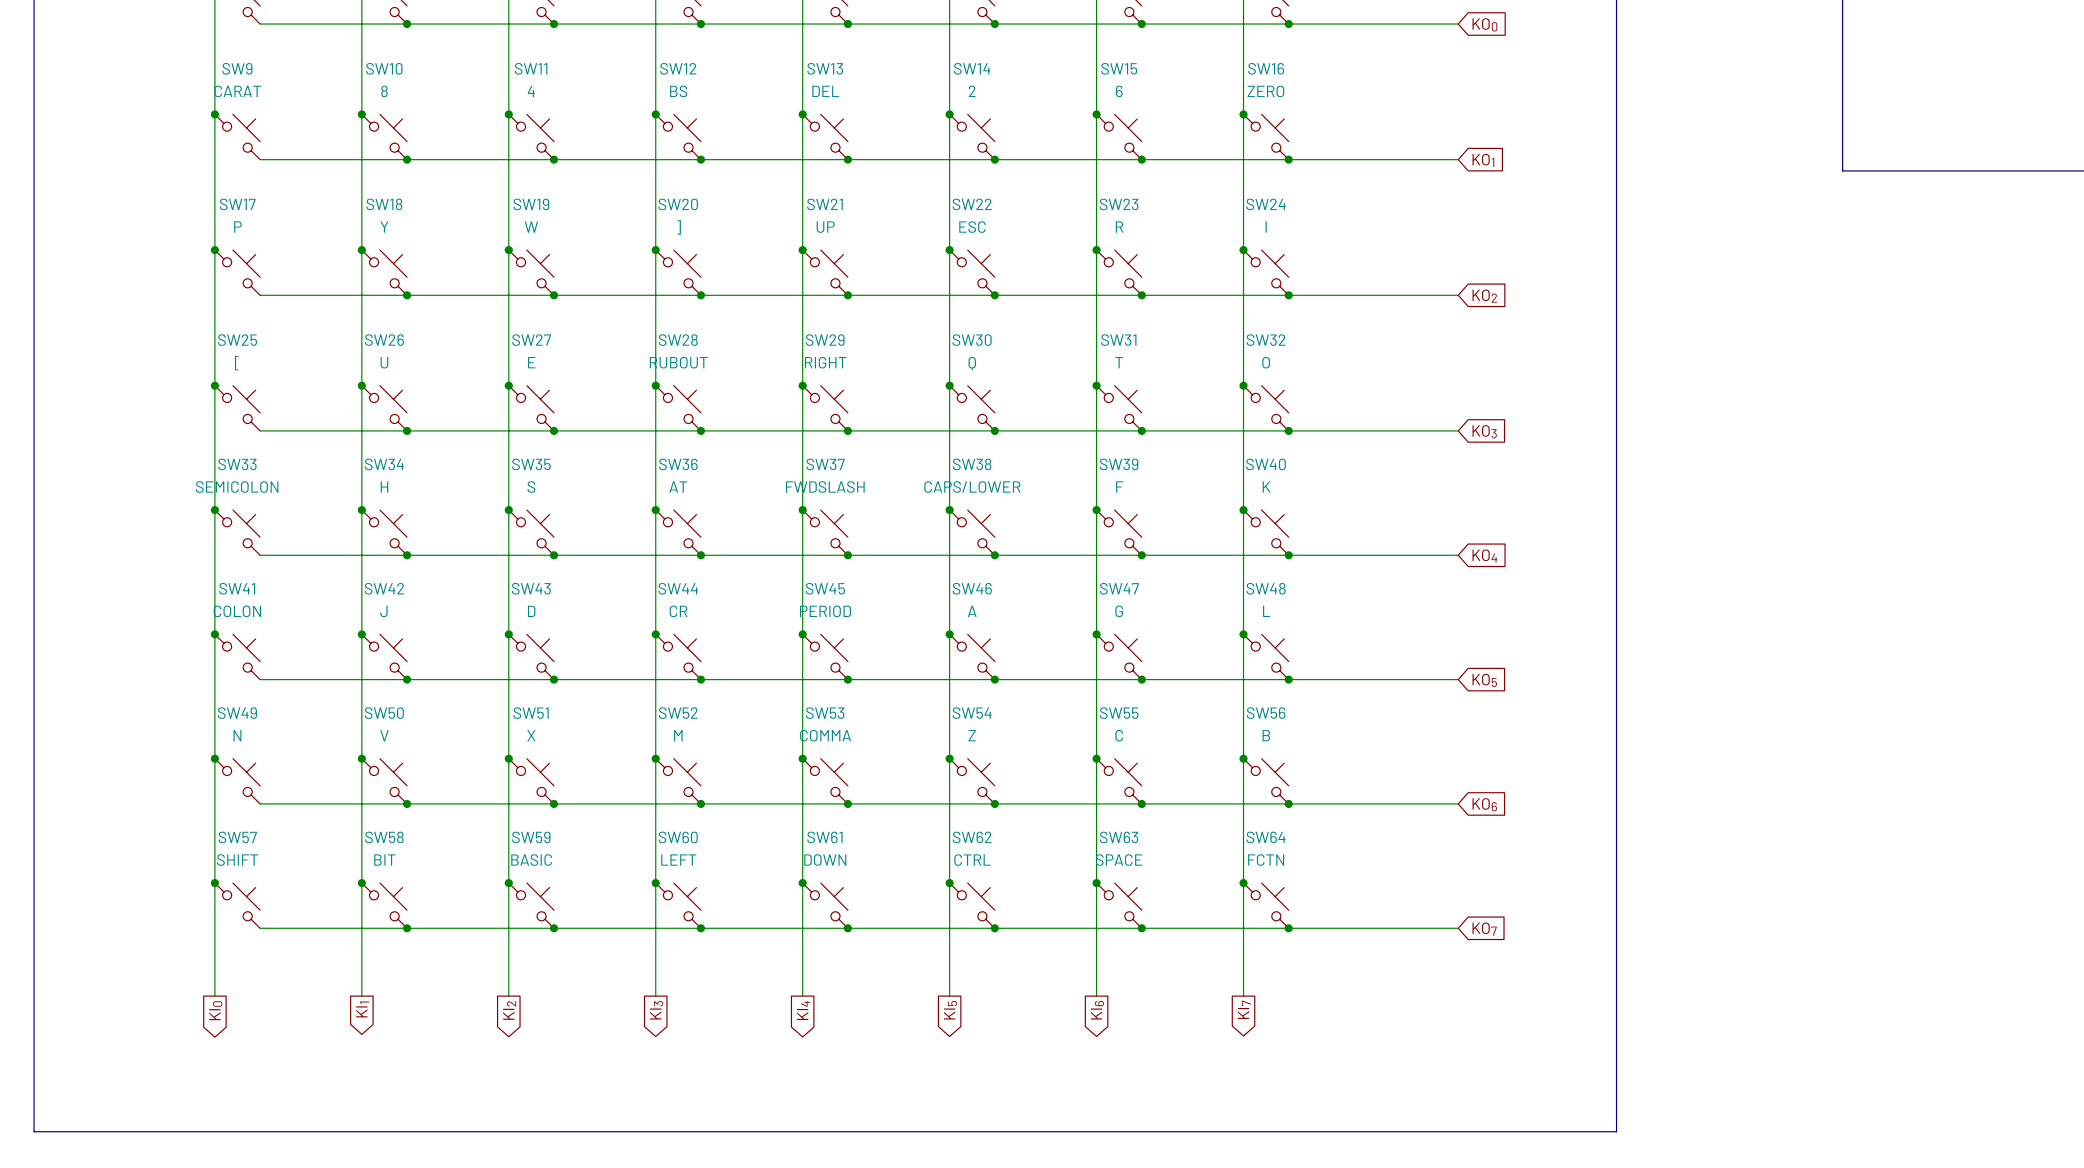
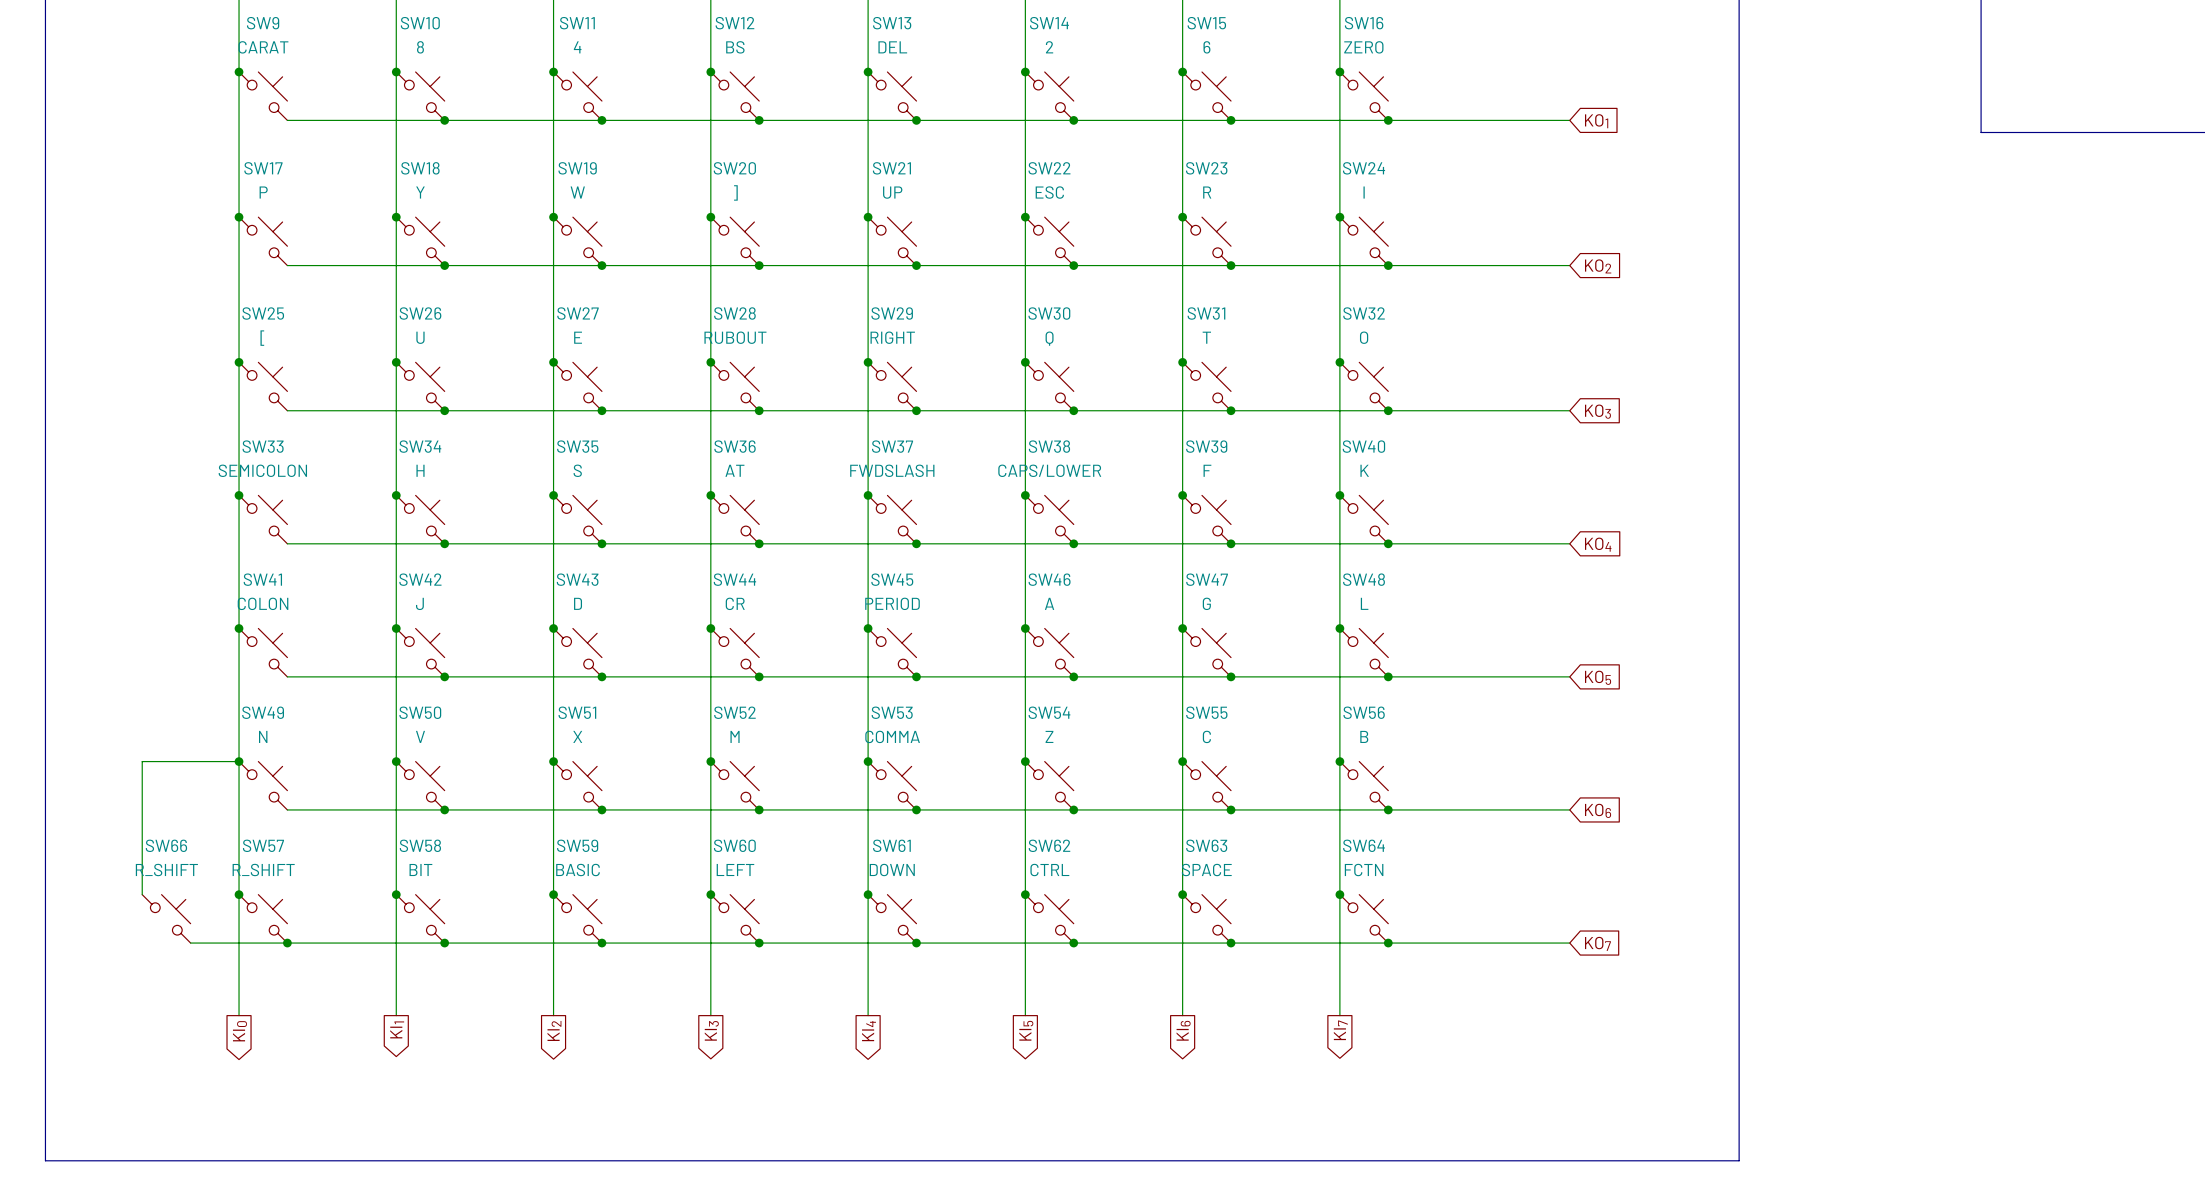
wire: none -> (239, 761) (142, 761) (142, 894)
SW57 value: SHIFT (237, 860) -> R_SHIFT (263, 870)
SW66: none -> R_SHIFT (166, 918)
wire: none -> (190, 943) (287, 943)
junction: none -> (287, 943)

